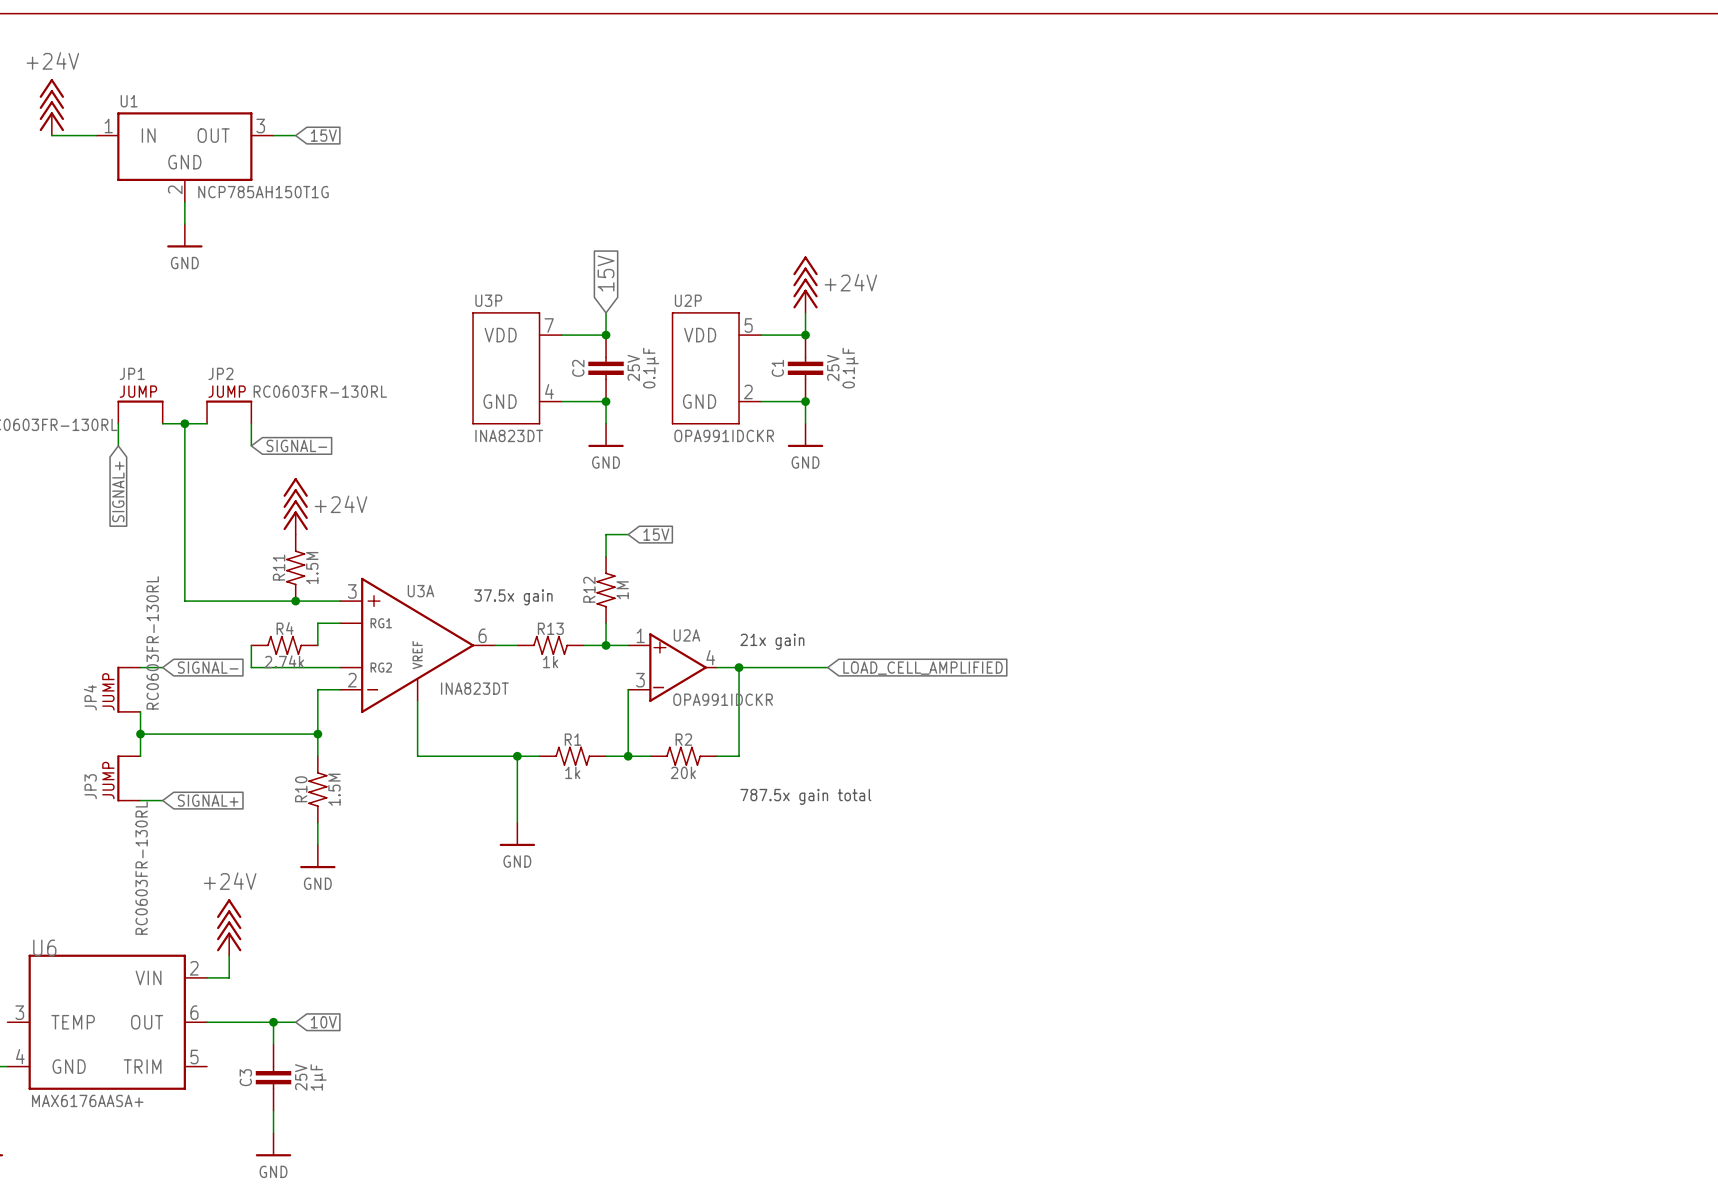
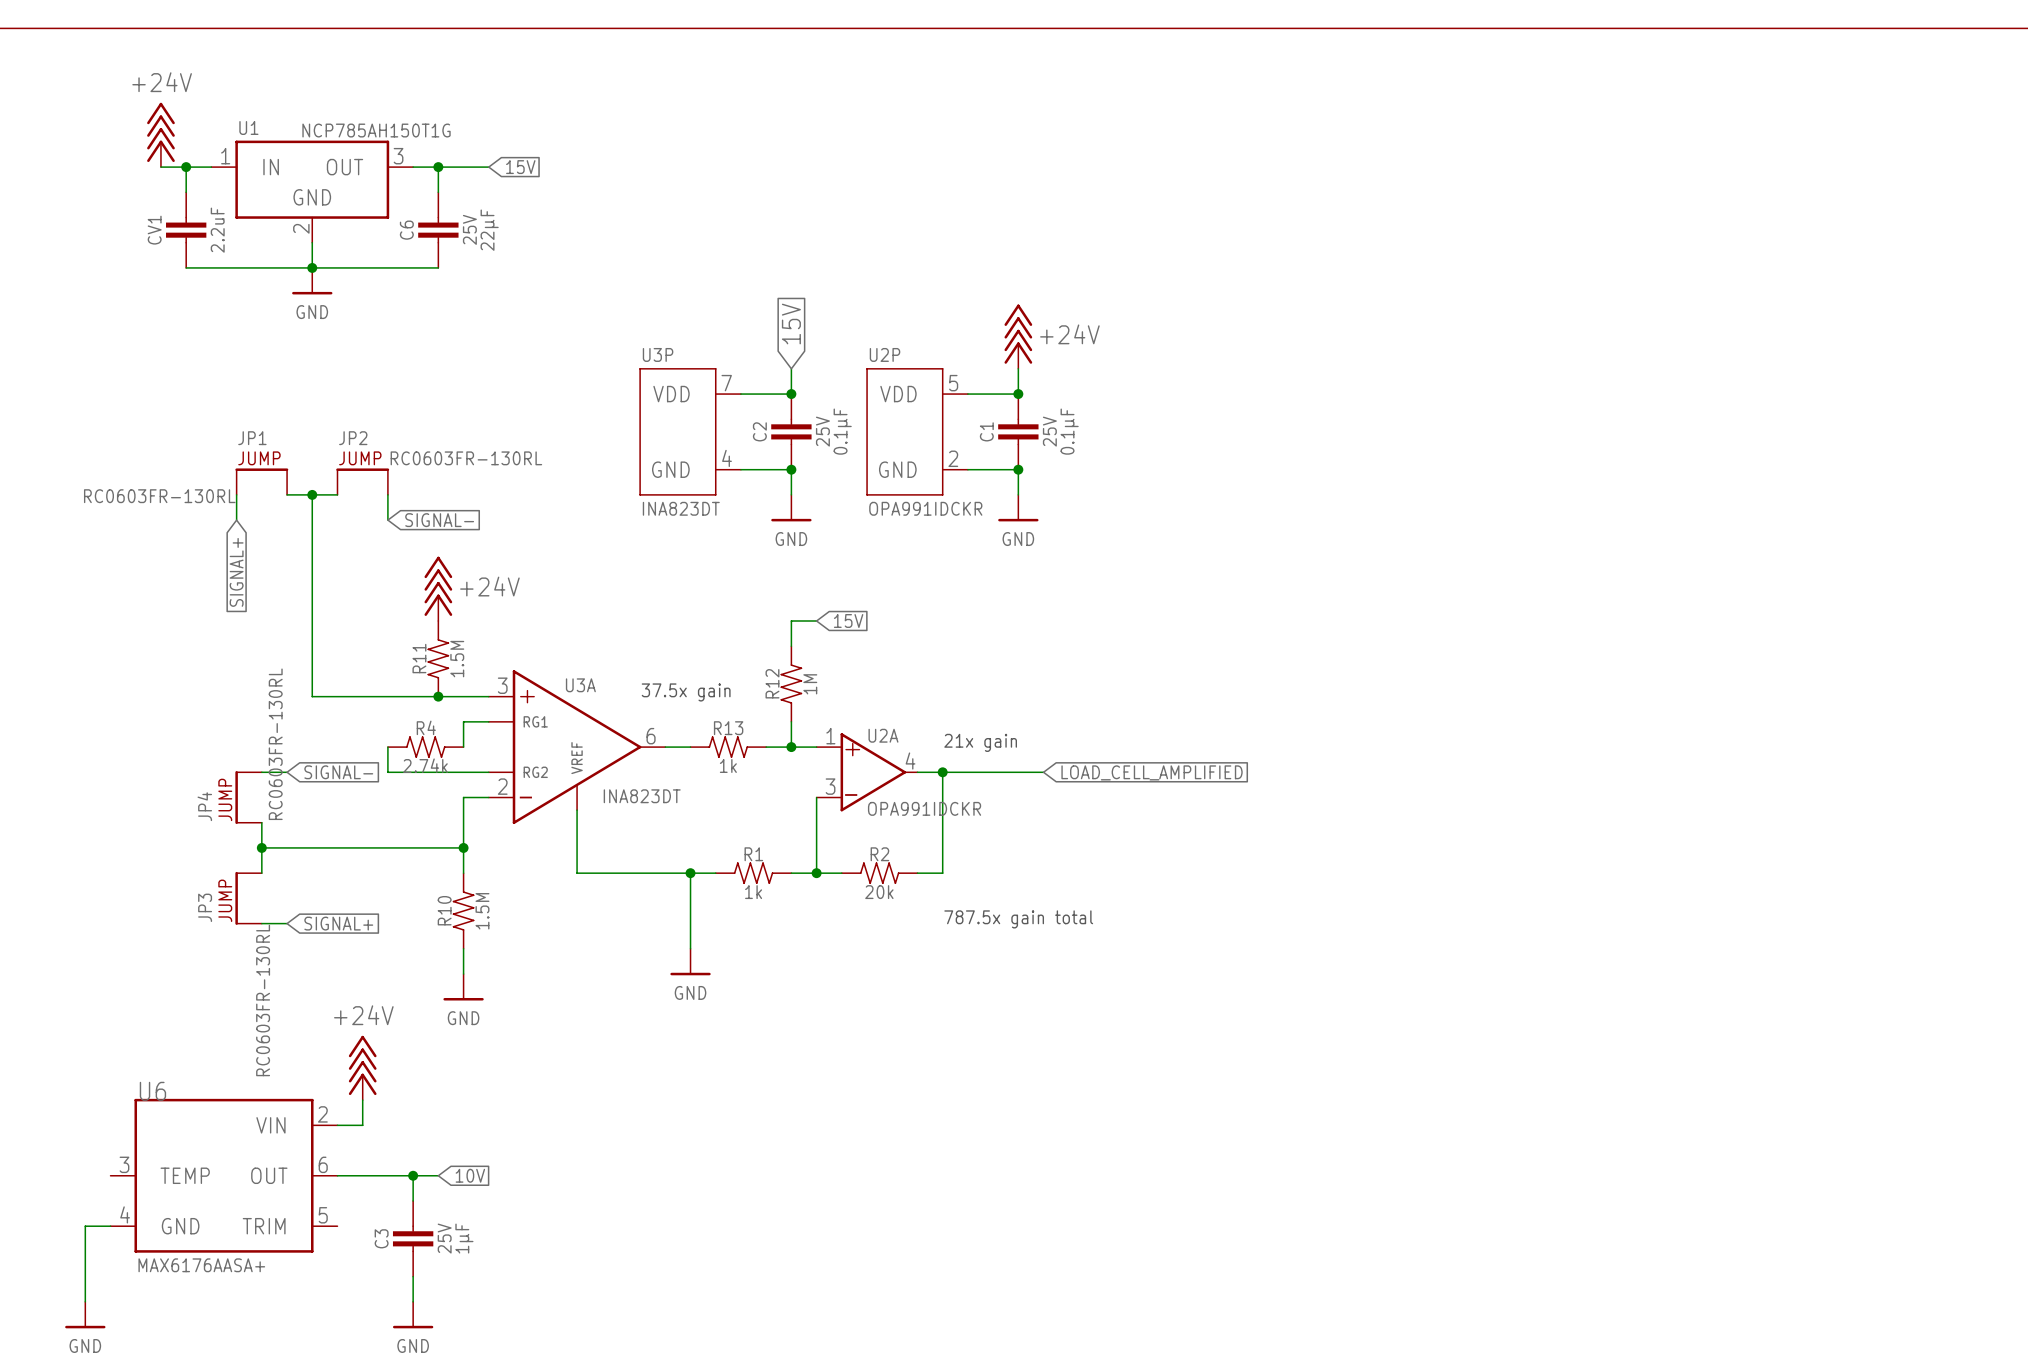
wire: none -> (186, 167) (186, 192)
junction: none -> (186, 167)
junction: none -> (438, 167)
global label position: 15V (323, 135) -> 15V (520, 167)
wire: none -> (488, 167) (438, 167) (438, 192)
CV1: none -> 2.2uF (186, 230)
C6: none -> (438, 230)
U1 text position: NCP785AH150T1G (263, 192) -> NCP785AH150T1G (376, 130)
wire: none -> (186, 267) (438, 267)
junction: none -> (312, 267)

